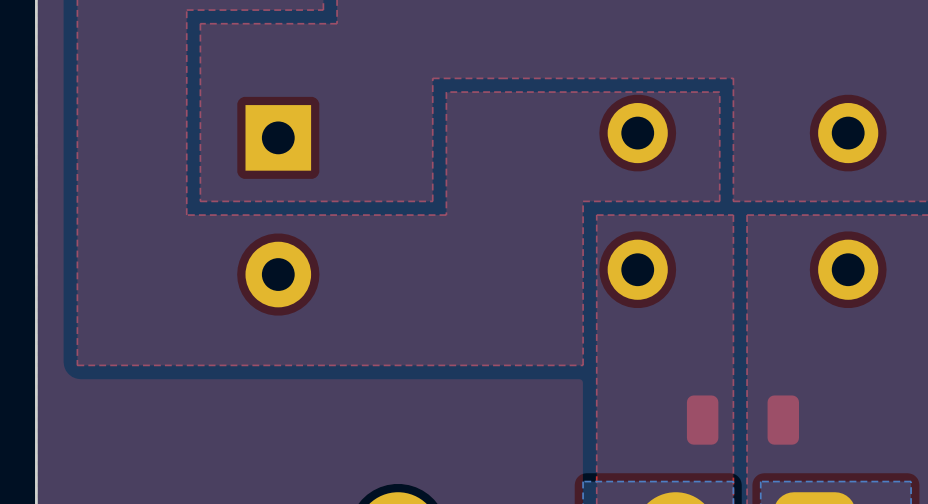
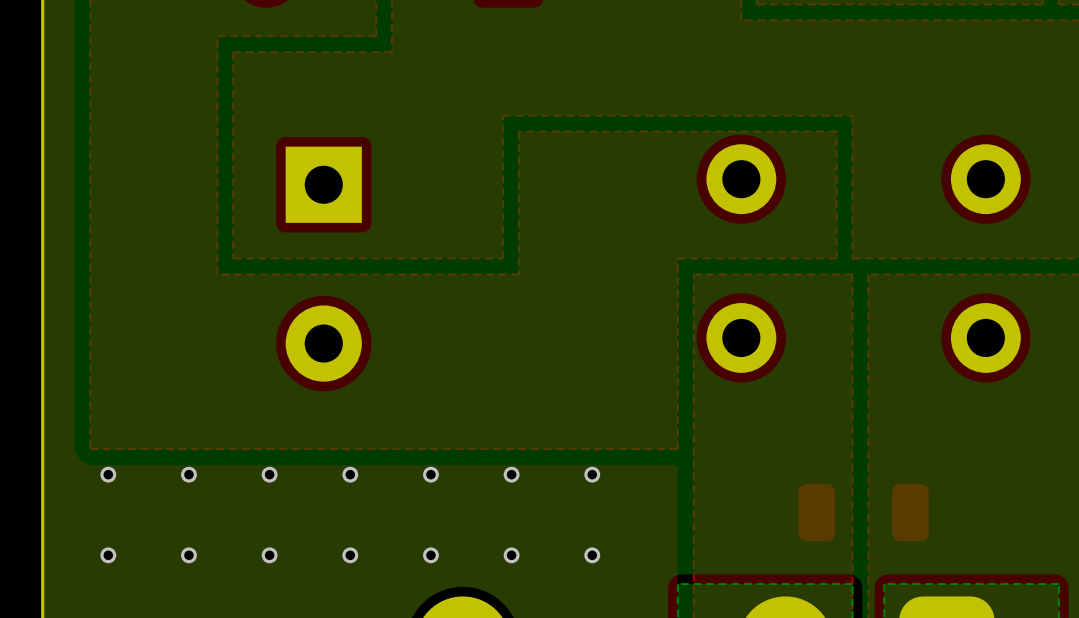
via: none -> (108, 474)
via: none -> (188, 474)
via: none -> (269, 474)
via: none -> (350, 474)
via: none -> (430, 474)
via: none -> (511, 474)
via: none -> (592, 474)
via: none -> (108, 555)
via: none -> (188, 555)
via: none -> (269, 555)
via: none -> (350, 555)
via: none -> (430, 555)
via: none -> (511, 555)
via: none -> (592, 555)

